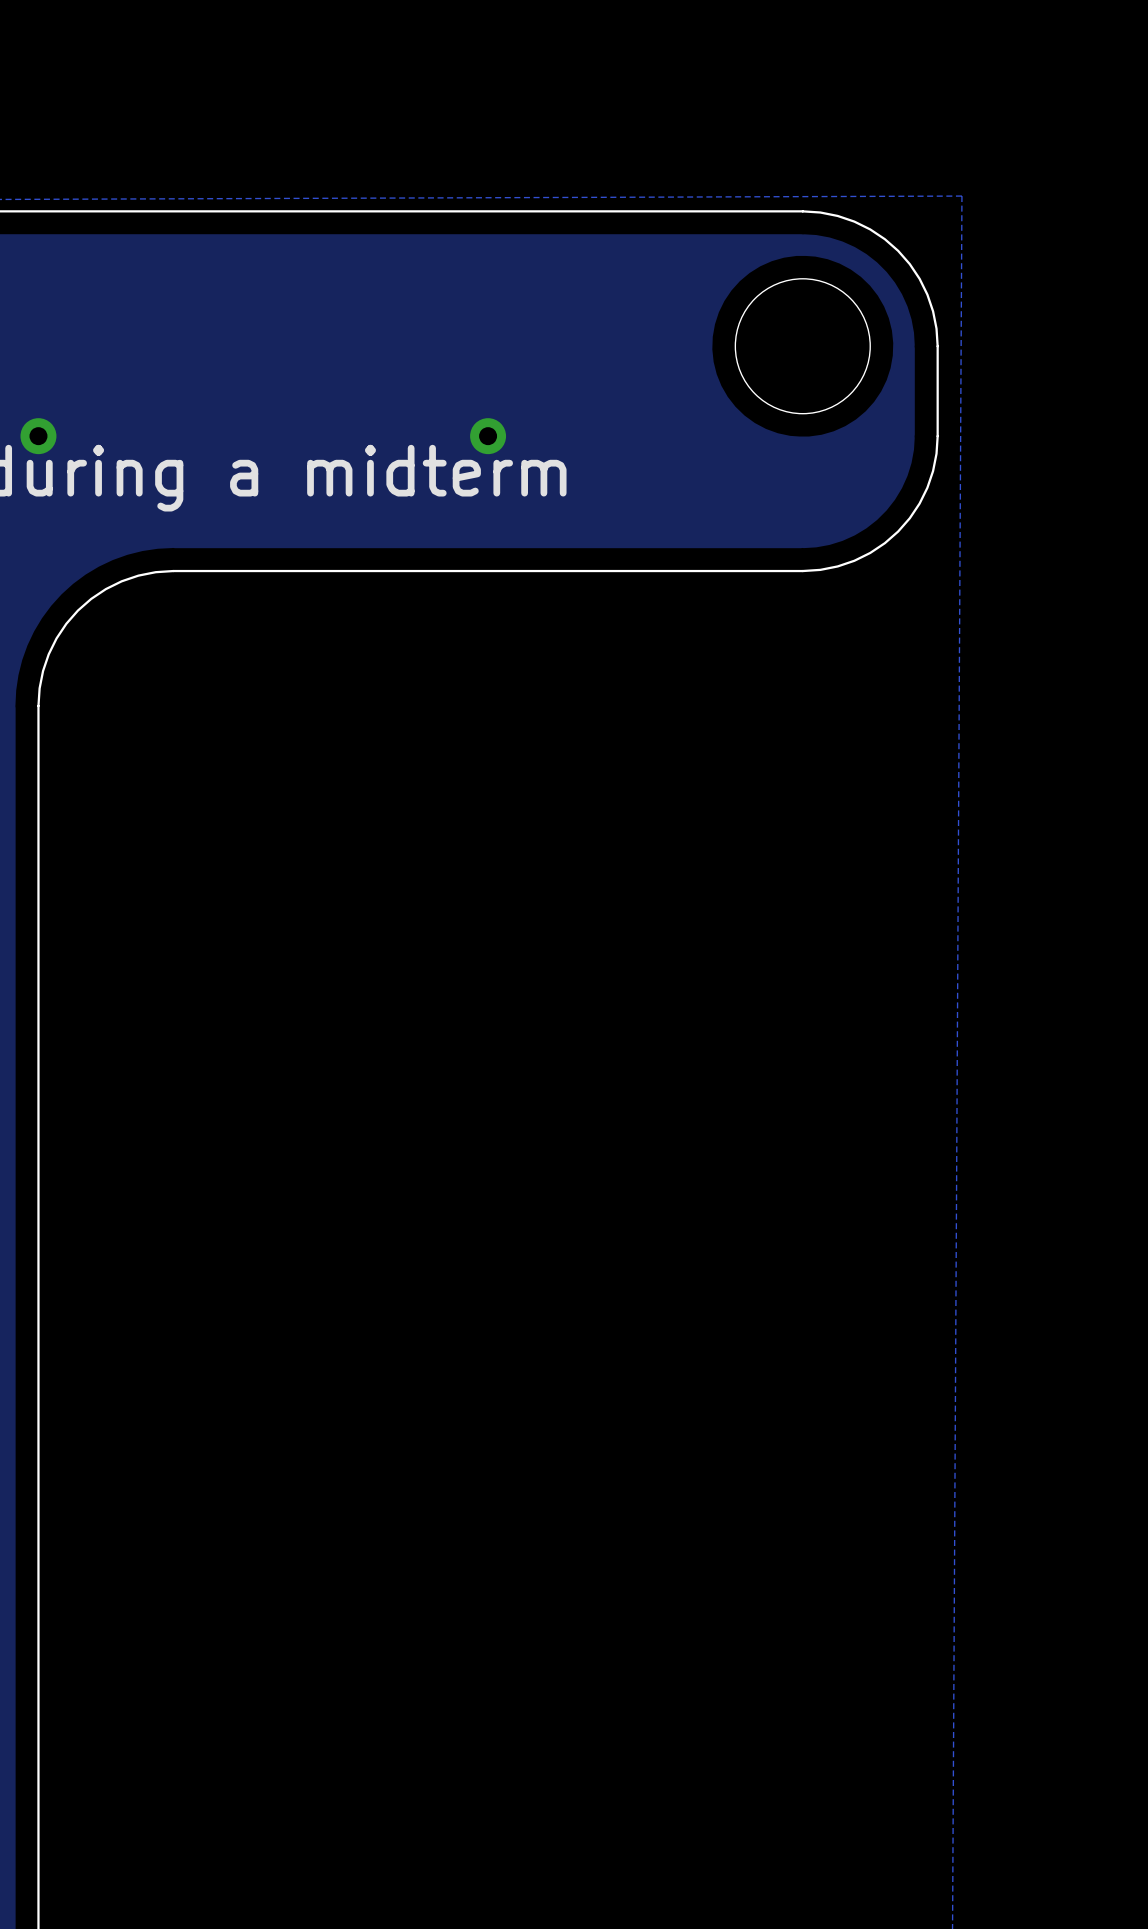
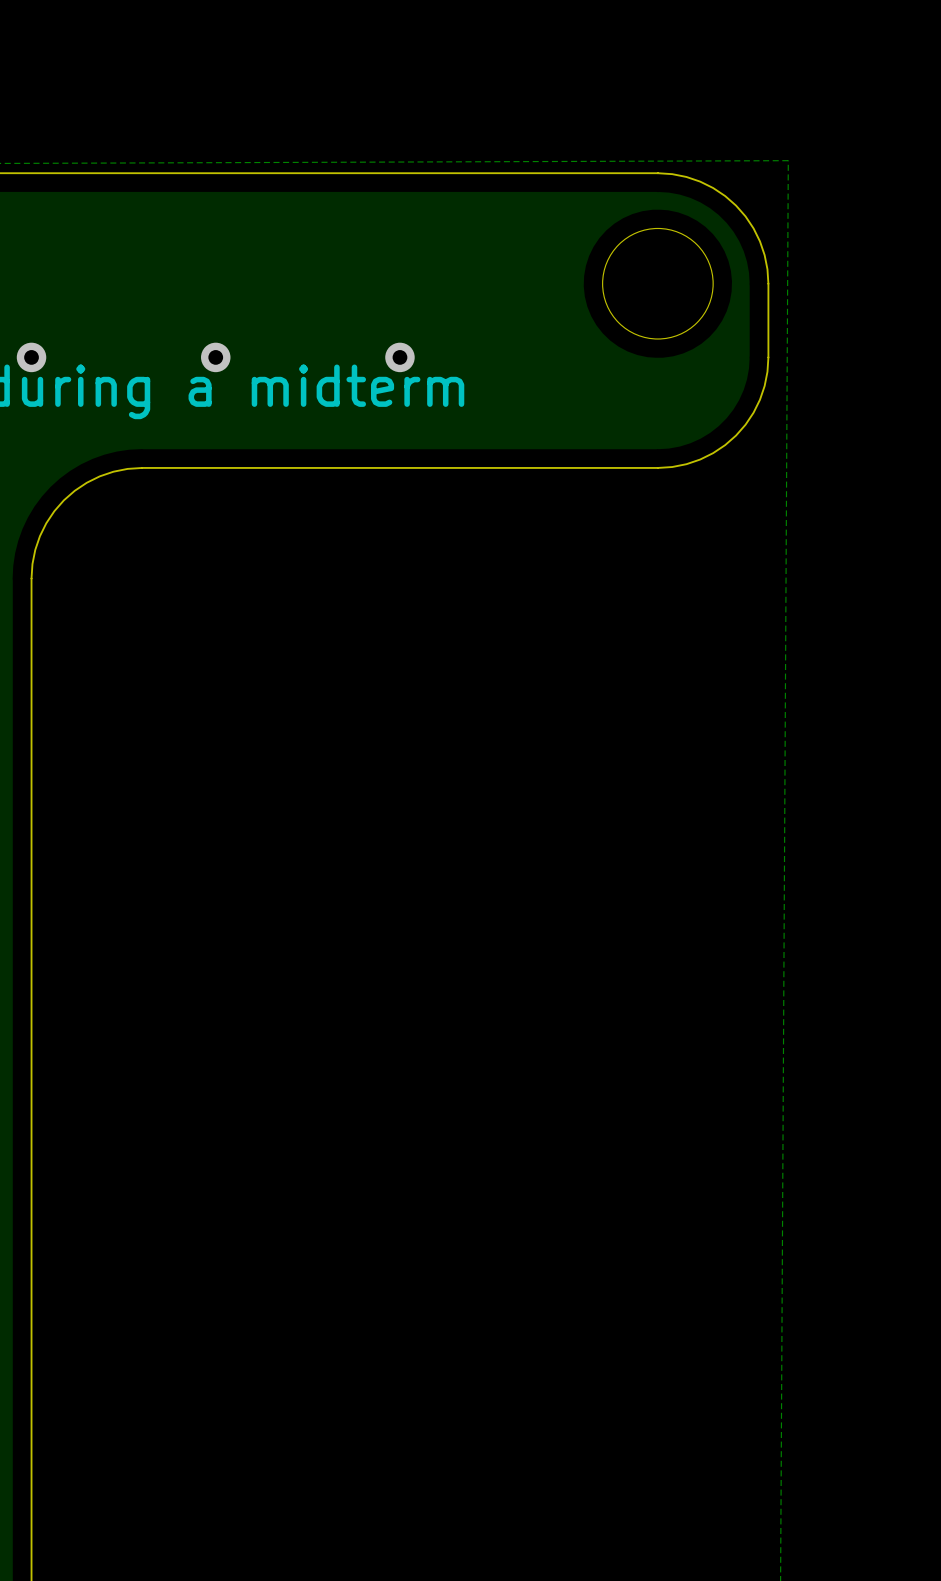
via: none -> (215, 357)

